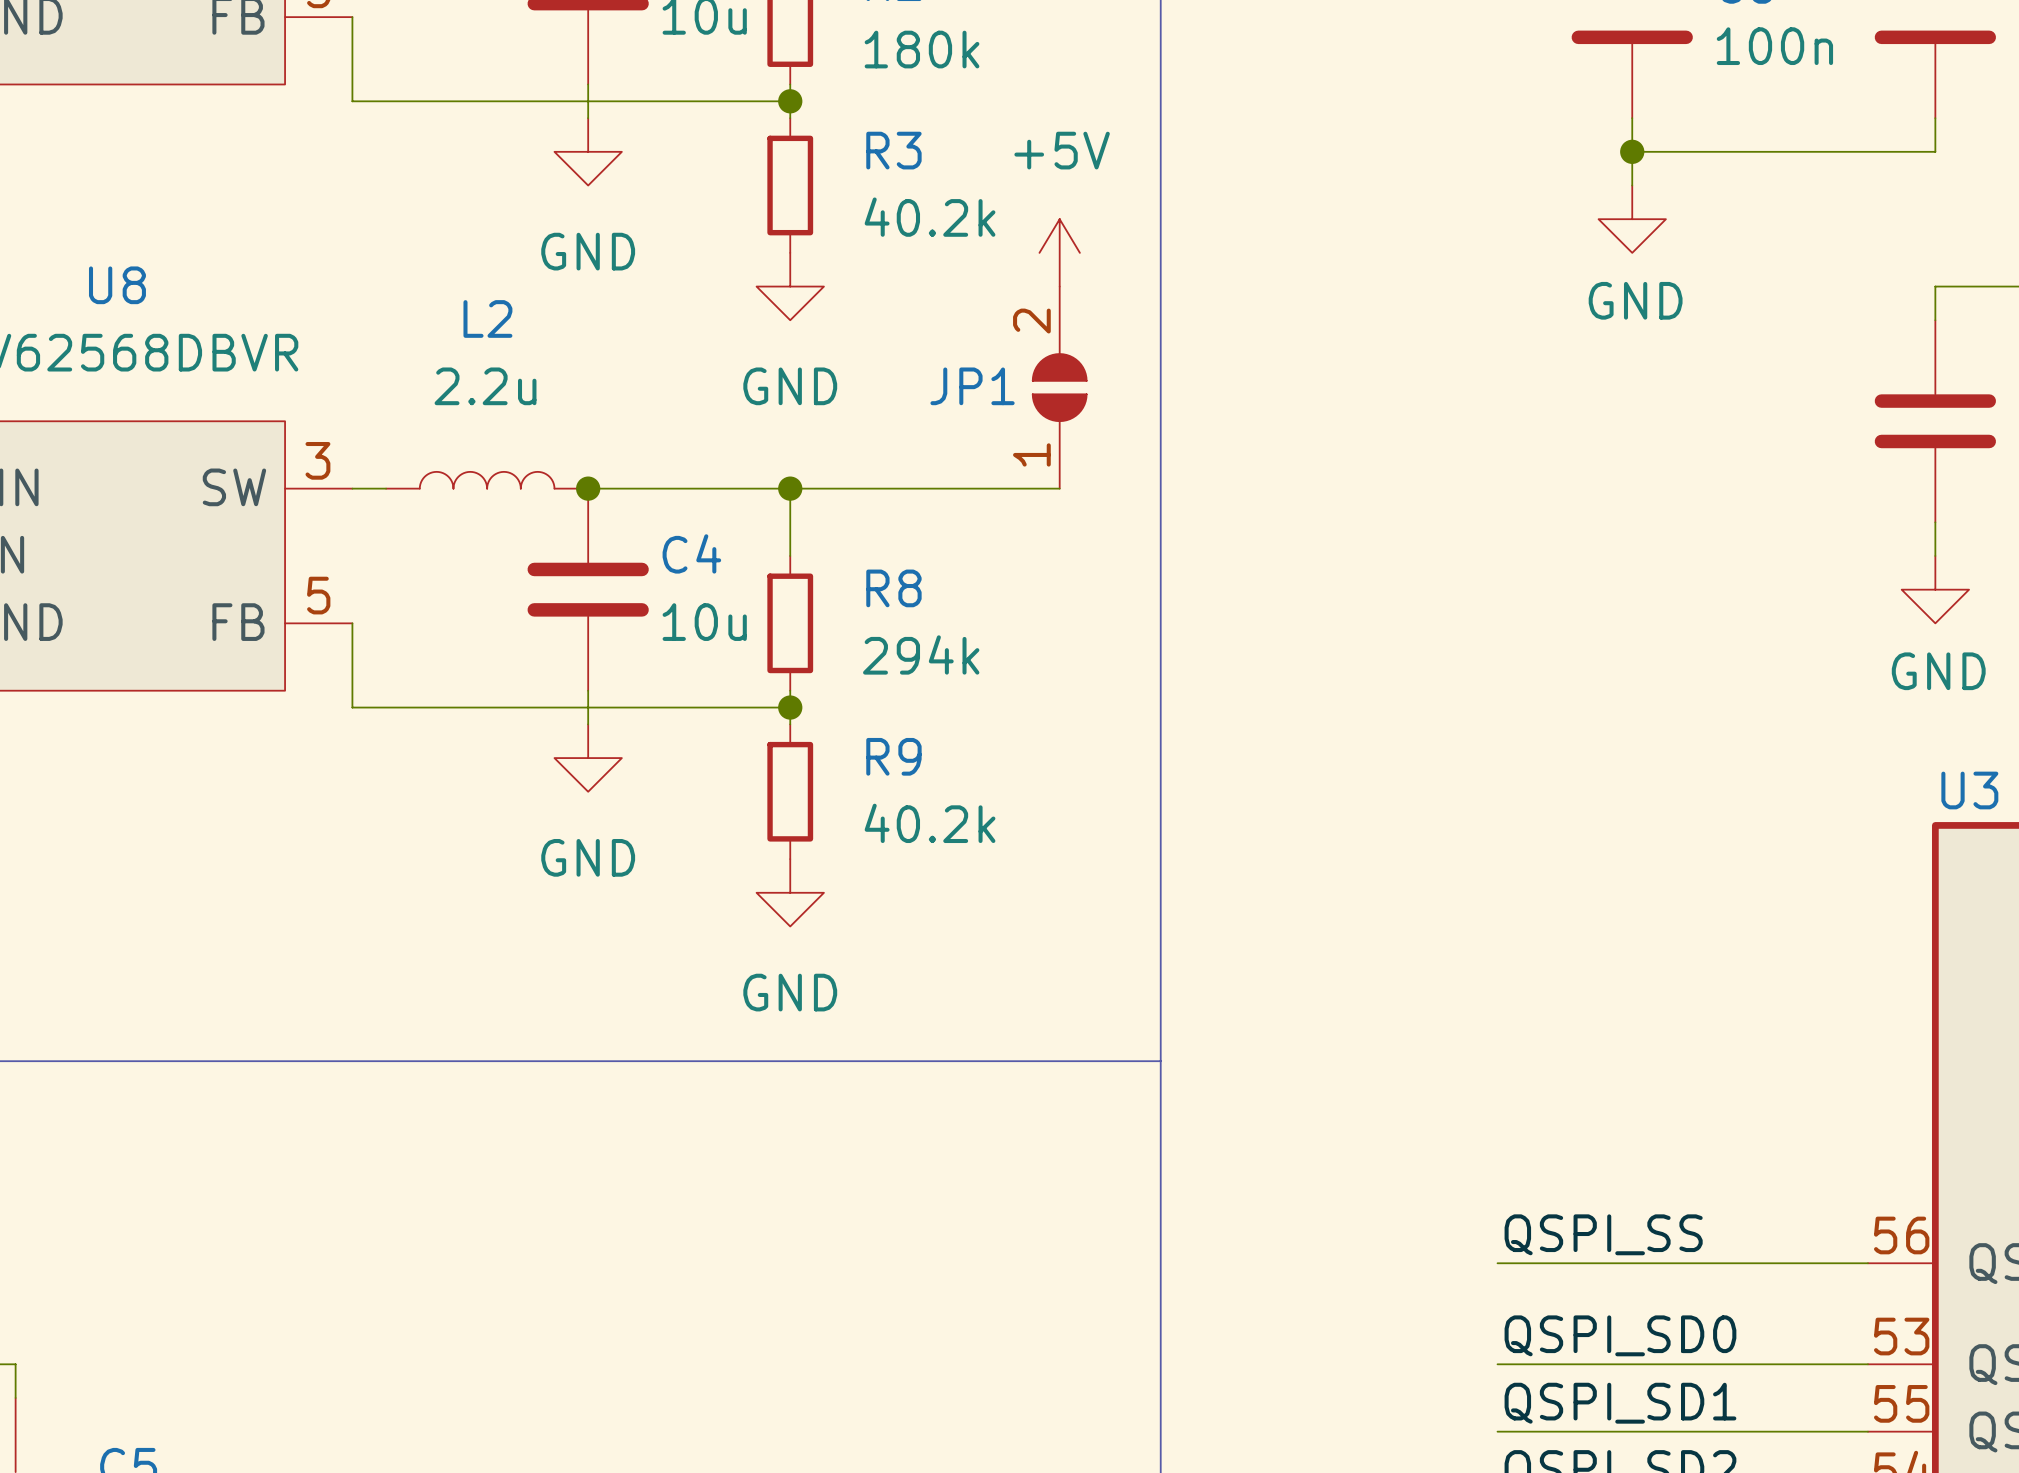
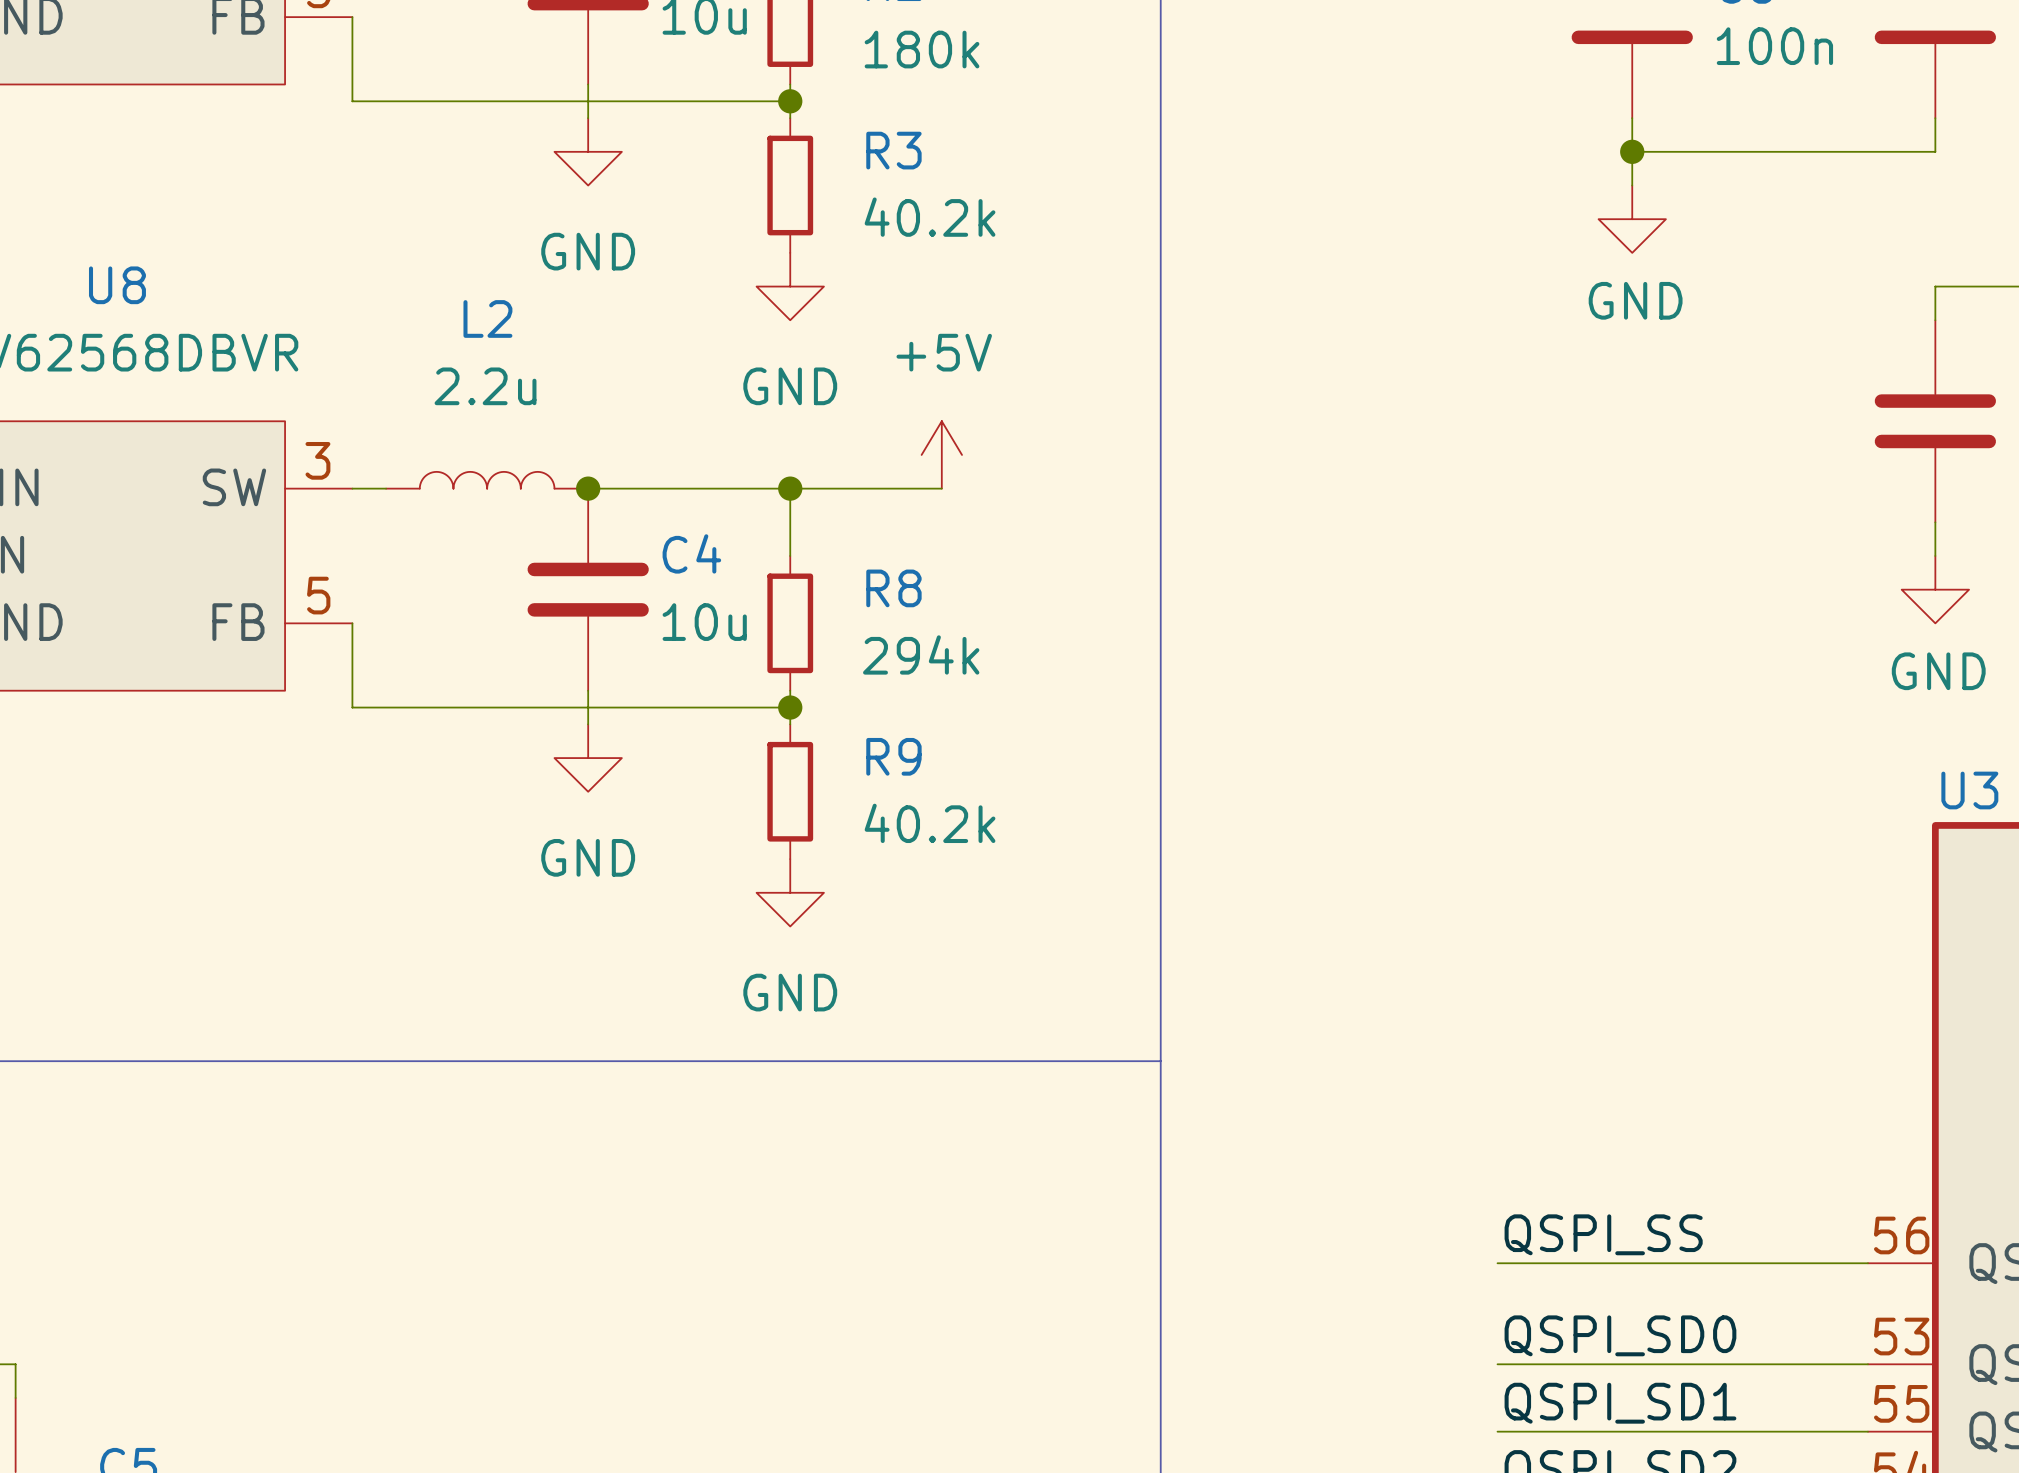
power symbol position: +5V (1059, 252) -> +5V (941, 454)
JP1: (1059, 387) -> none
wire: (941, 488) (1059, 488) -> none

